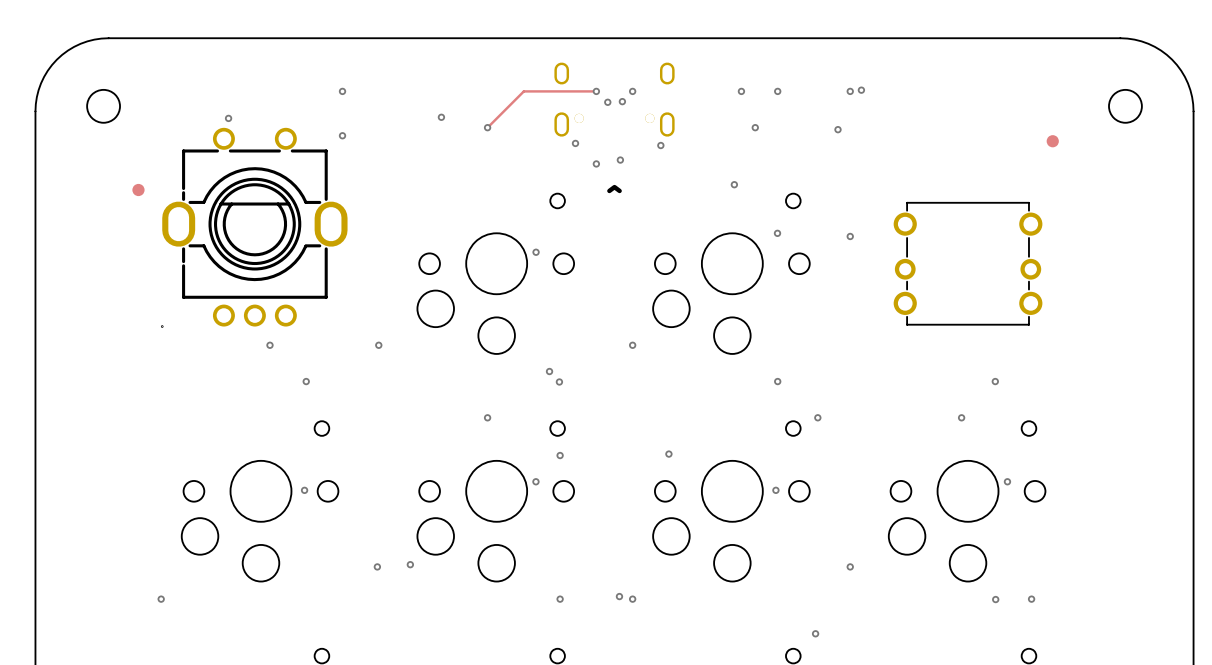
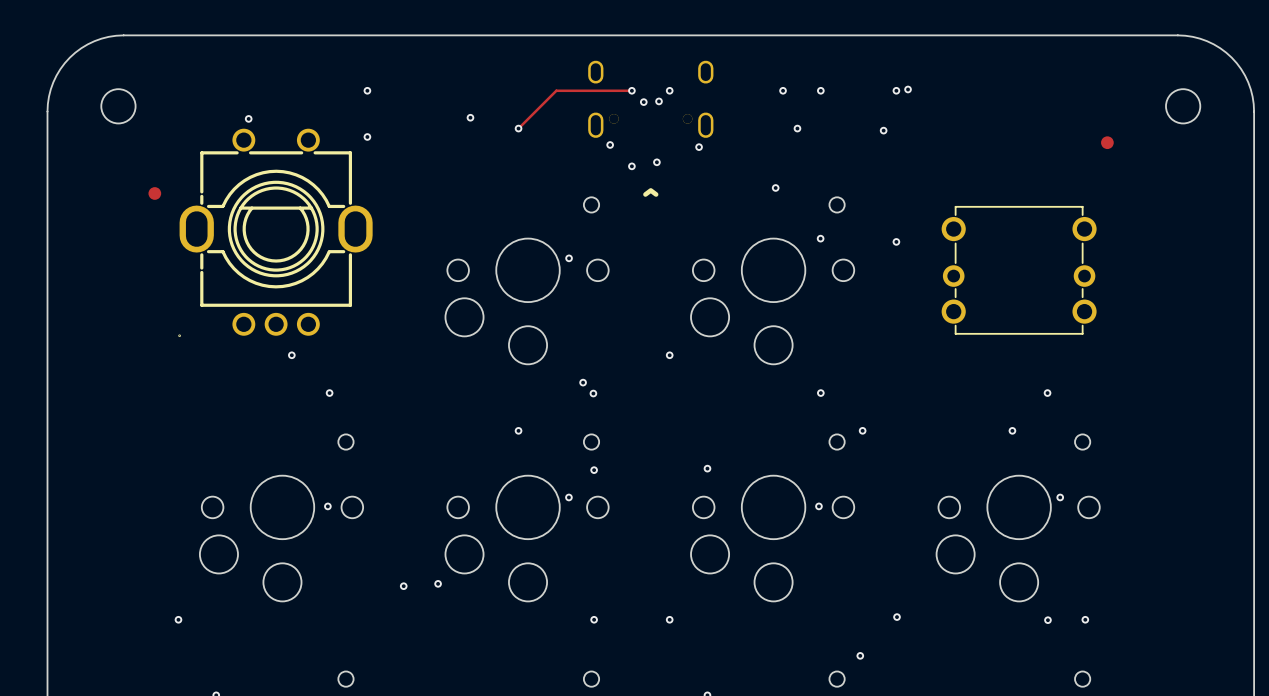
via: (378, 345) -> none
via position: (850, 566) -> (897, 617)
via: (619, 596) -> none

